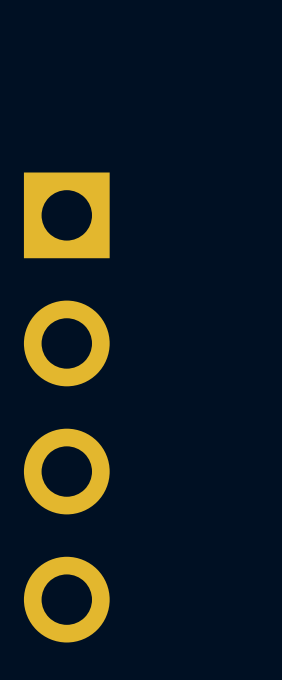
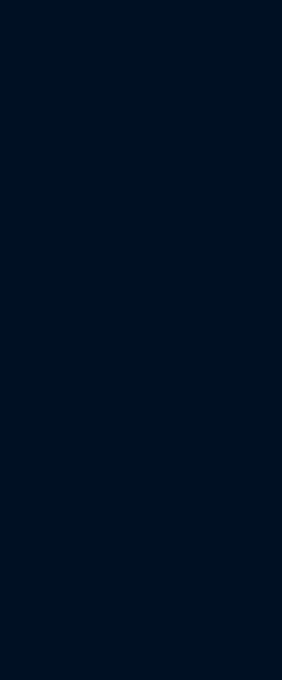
part: (66, 407) -> none

